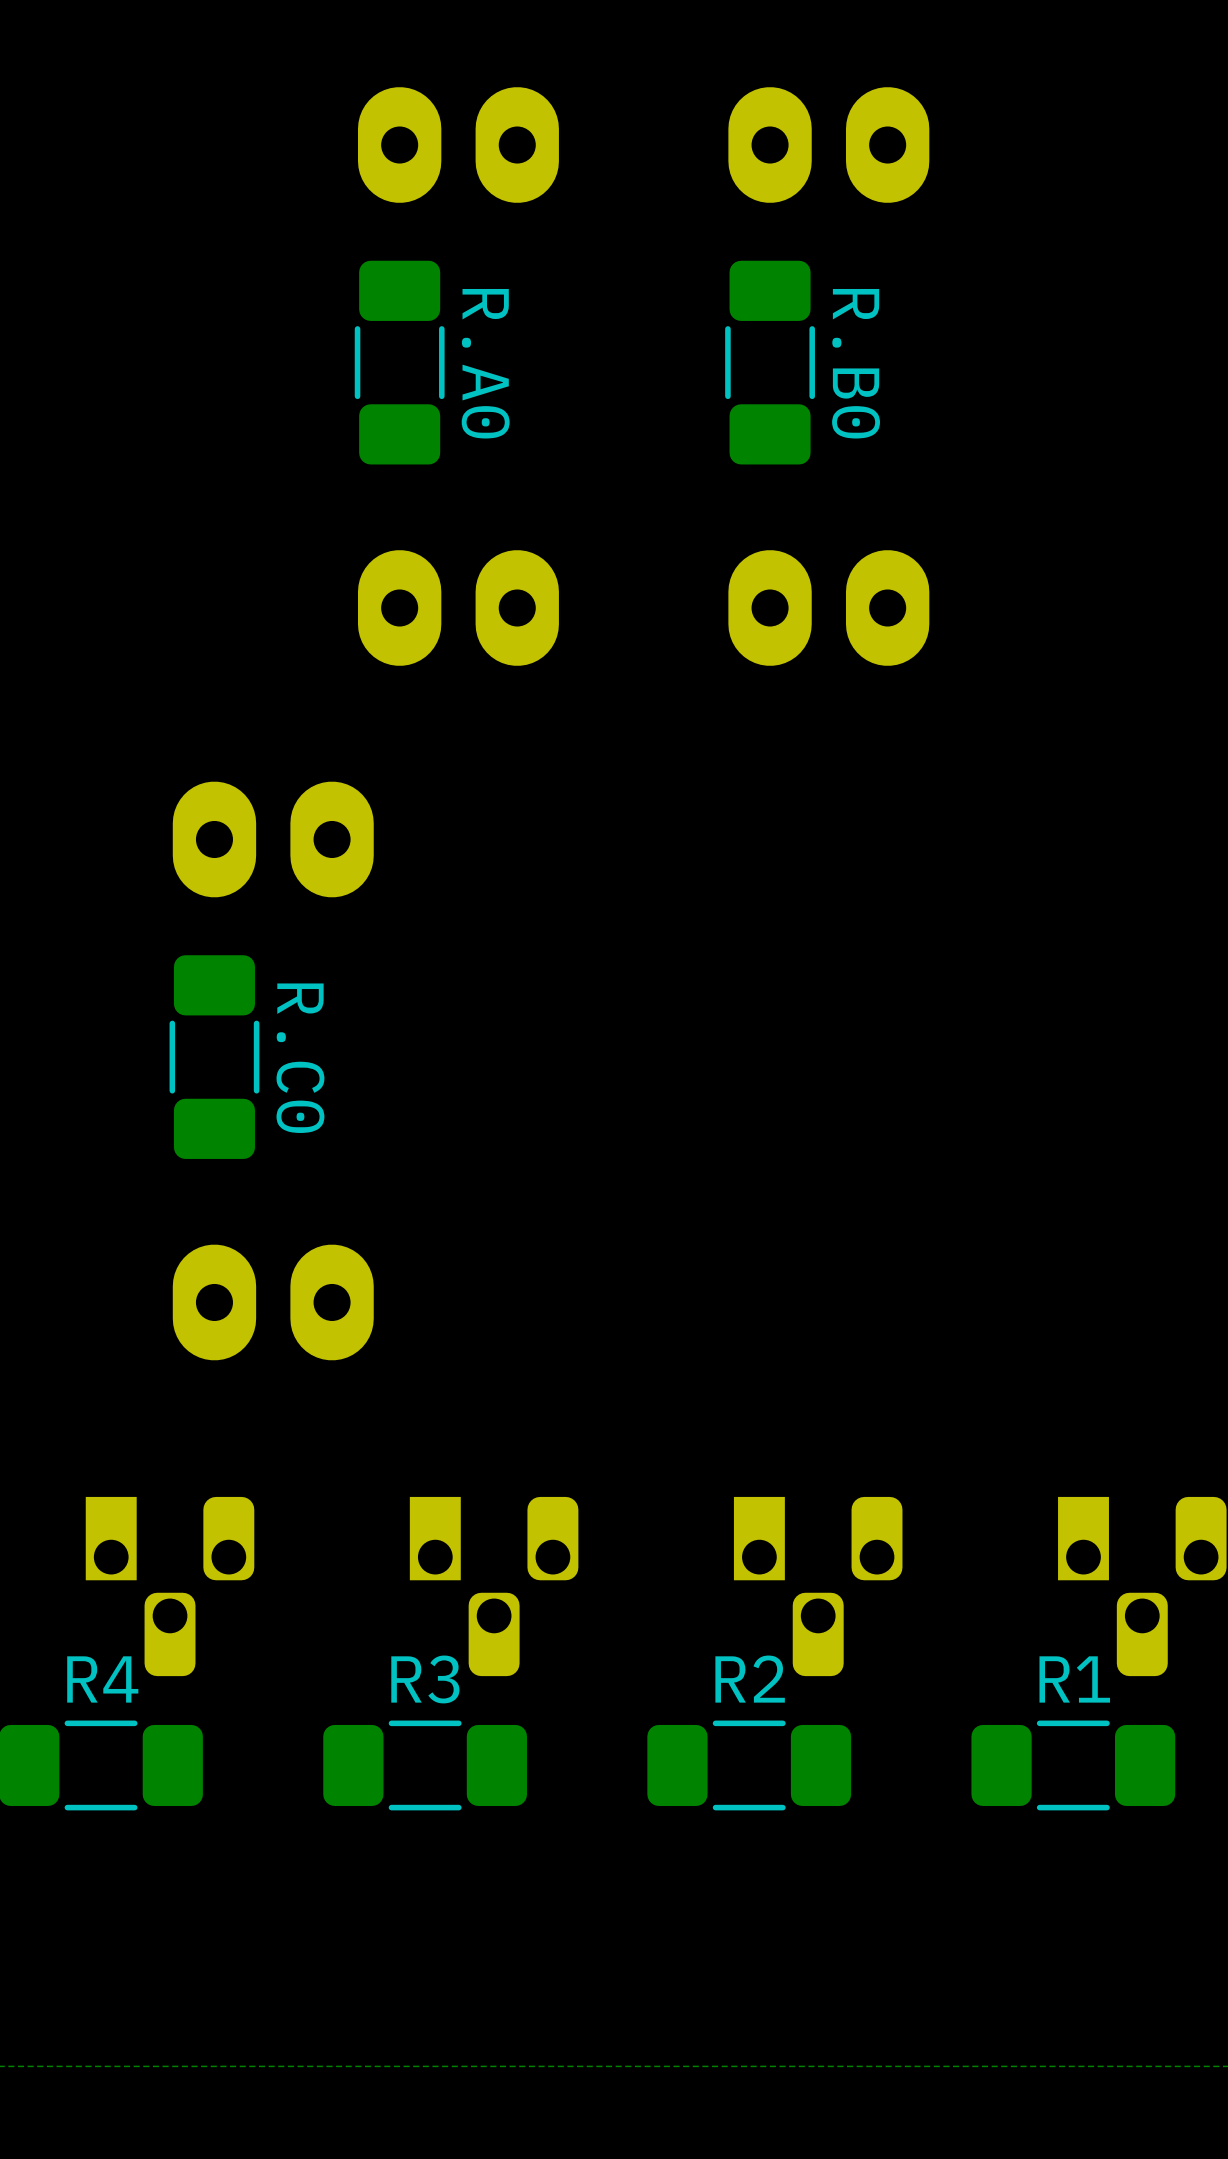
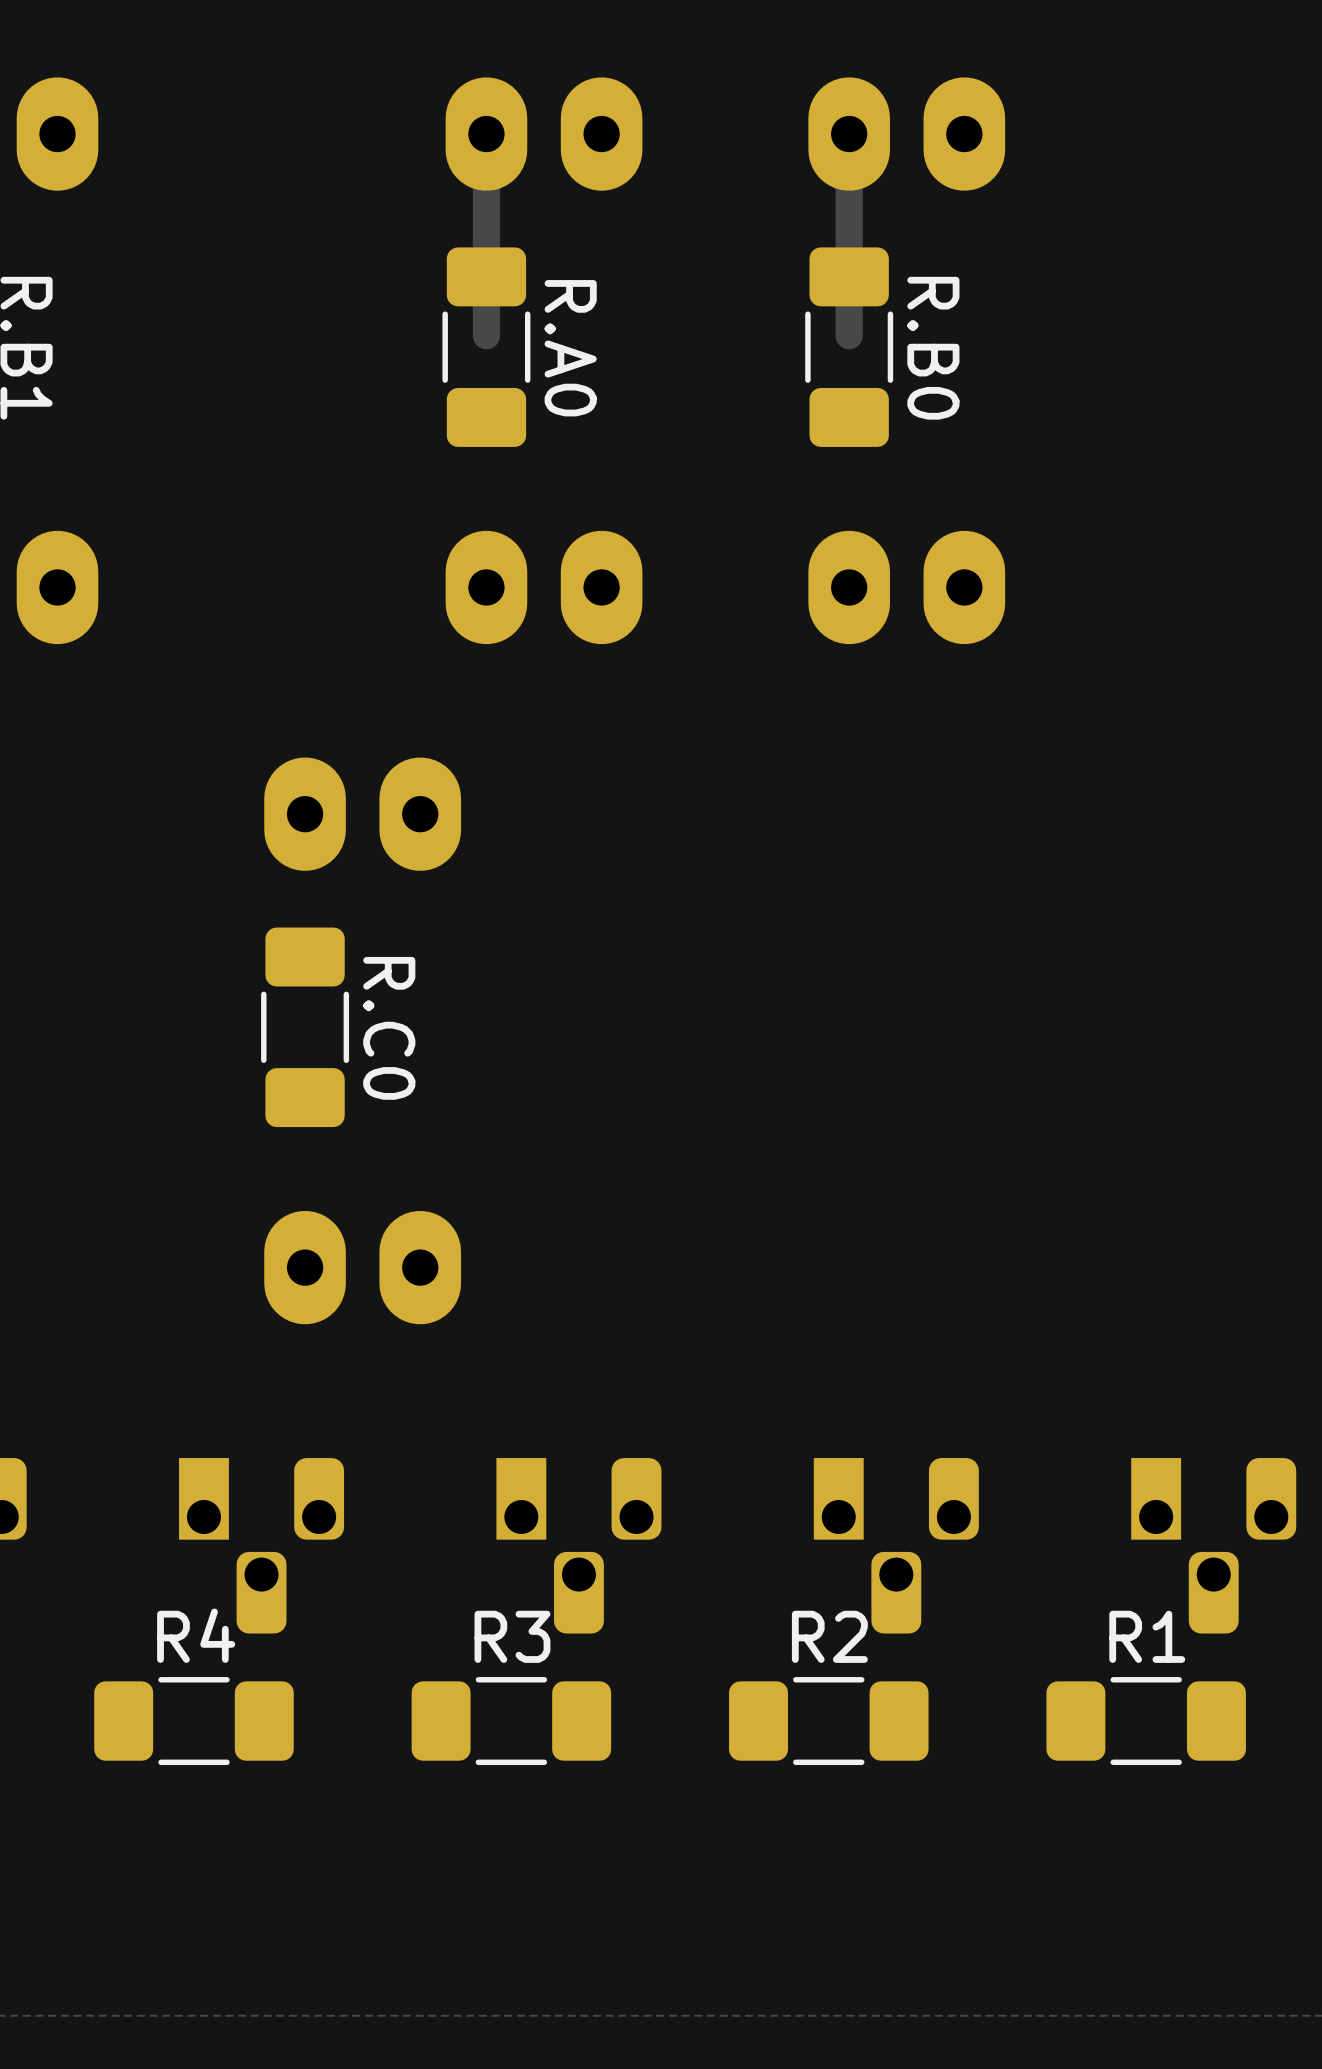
track: none -> (486, 179) (486, 335)
track: none -> (849, 179) (849, 335)

